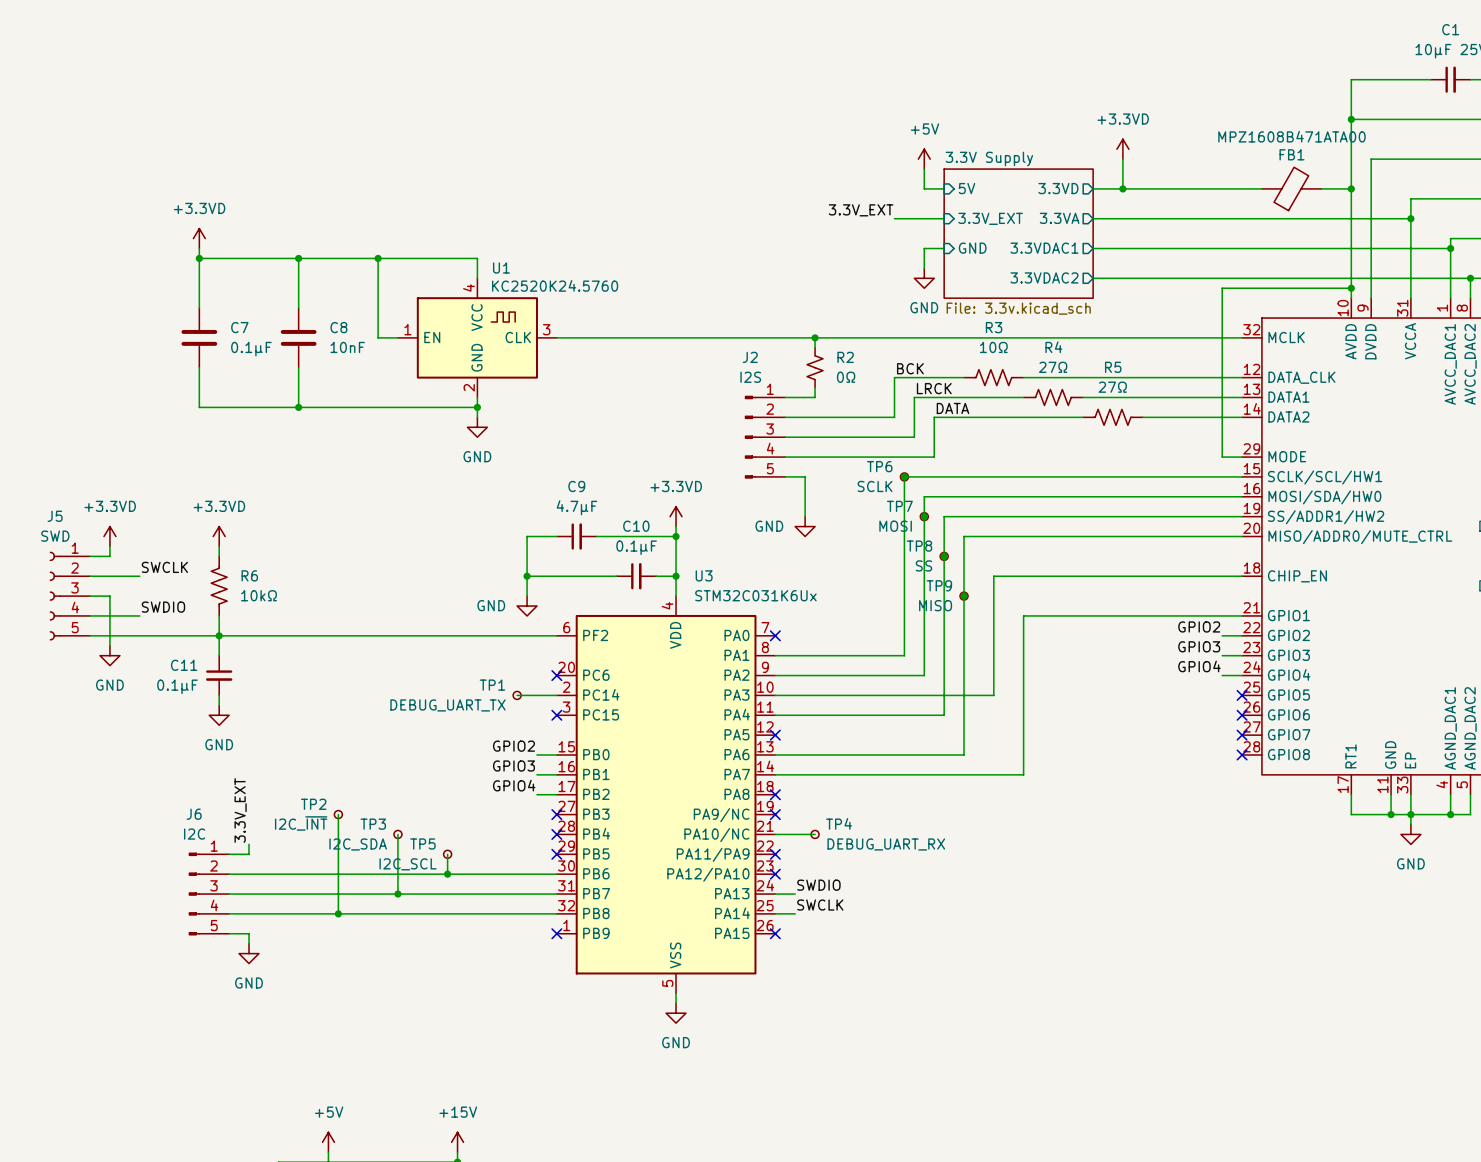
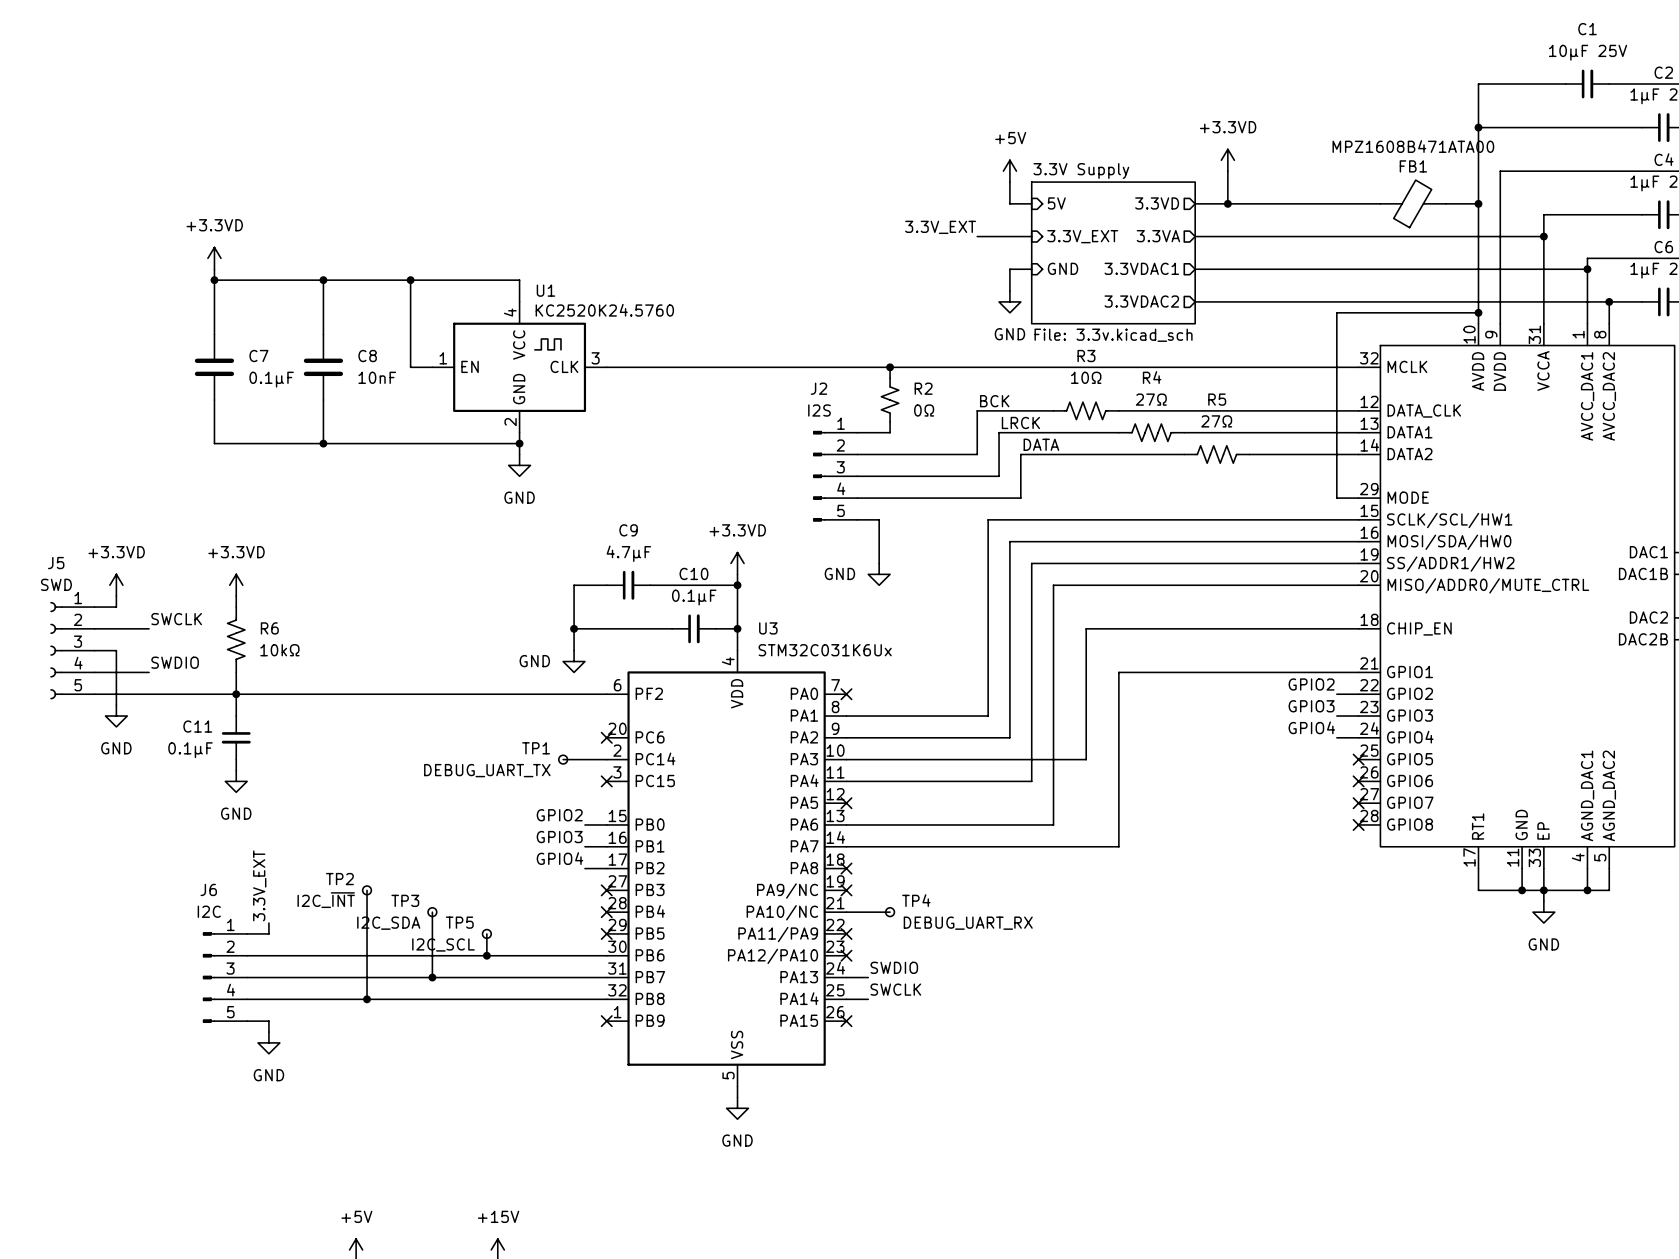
junction: (904, 476) -> none
TP6: SCLK (904, 476) -> none
junction: (924, 516) -> none
TP7: MOSI (924, 516) -> none
junction: (944, 556) -> none
TP8: SS (944, 556) -> none
junction: (964, 596) -> none
TP9: MISO (964, 596) -> none

